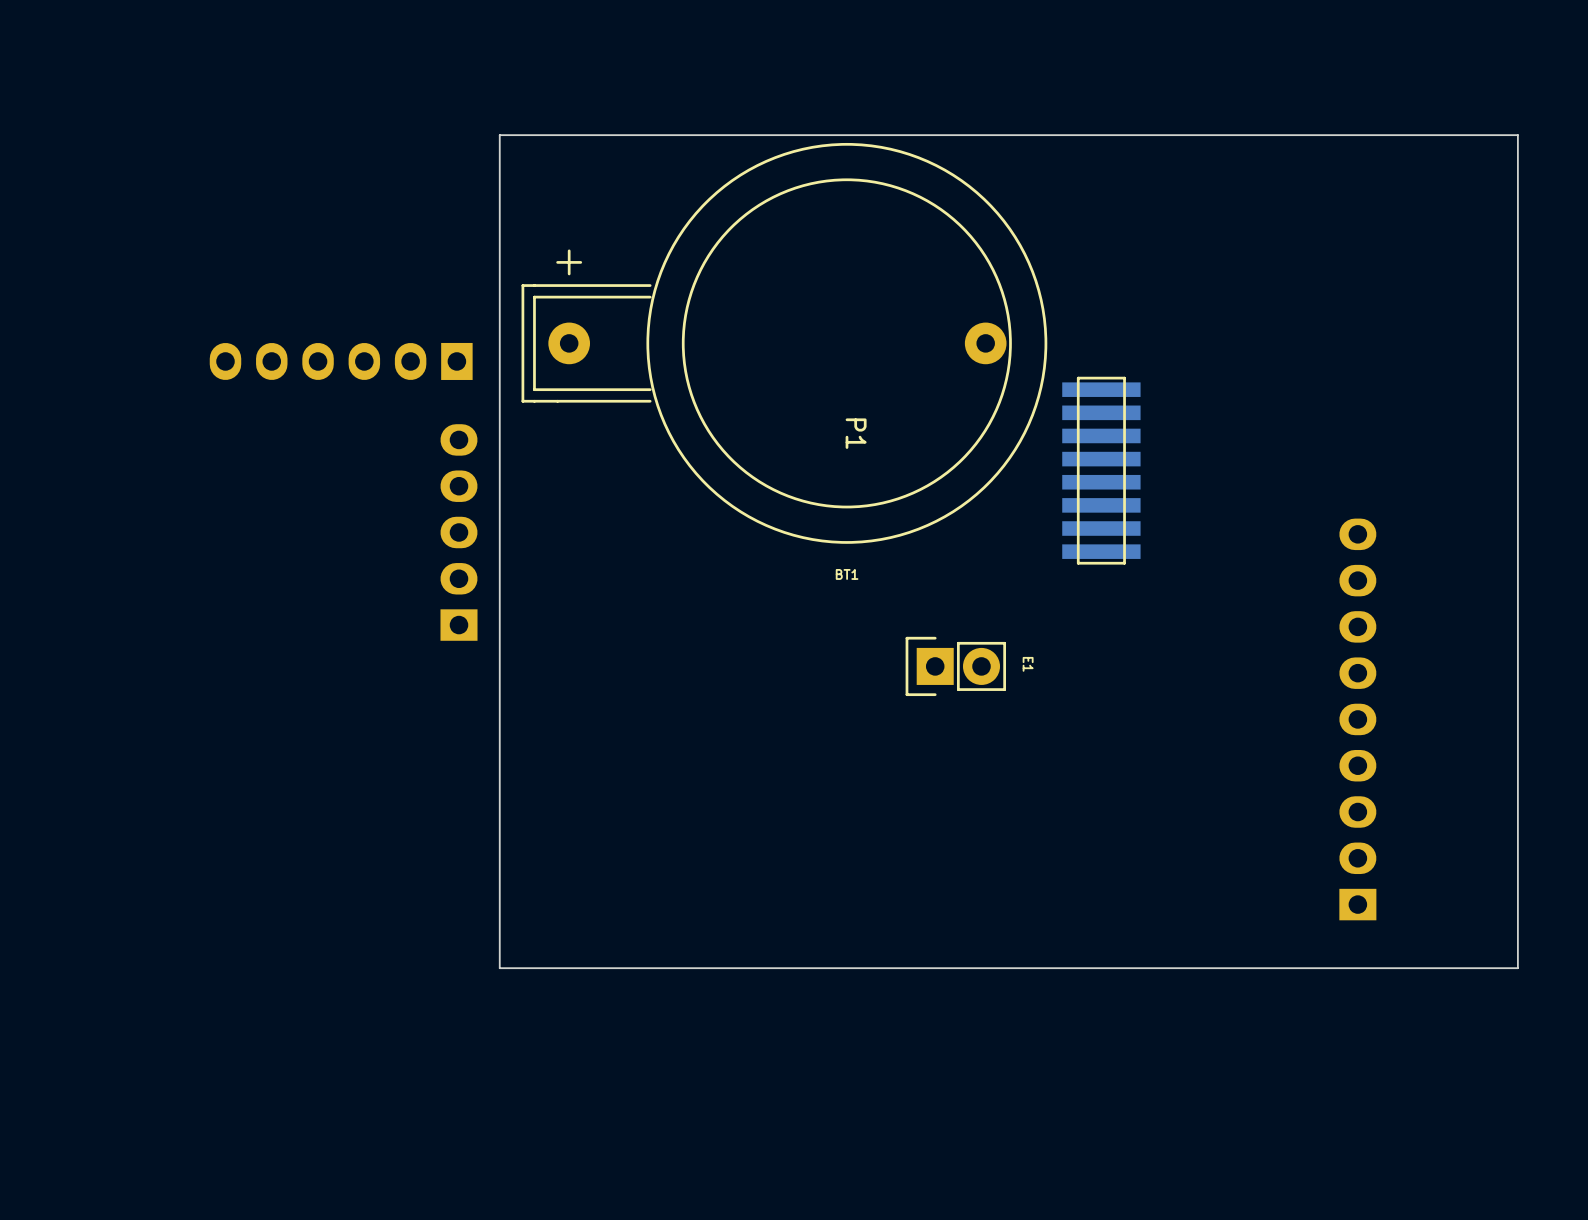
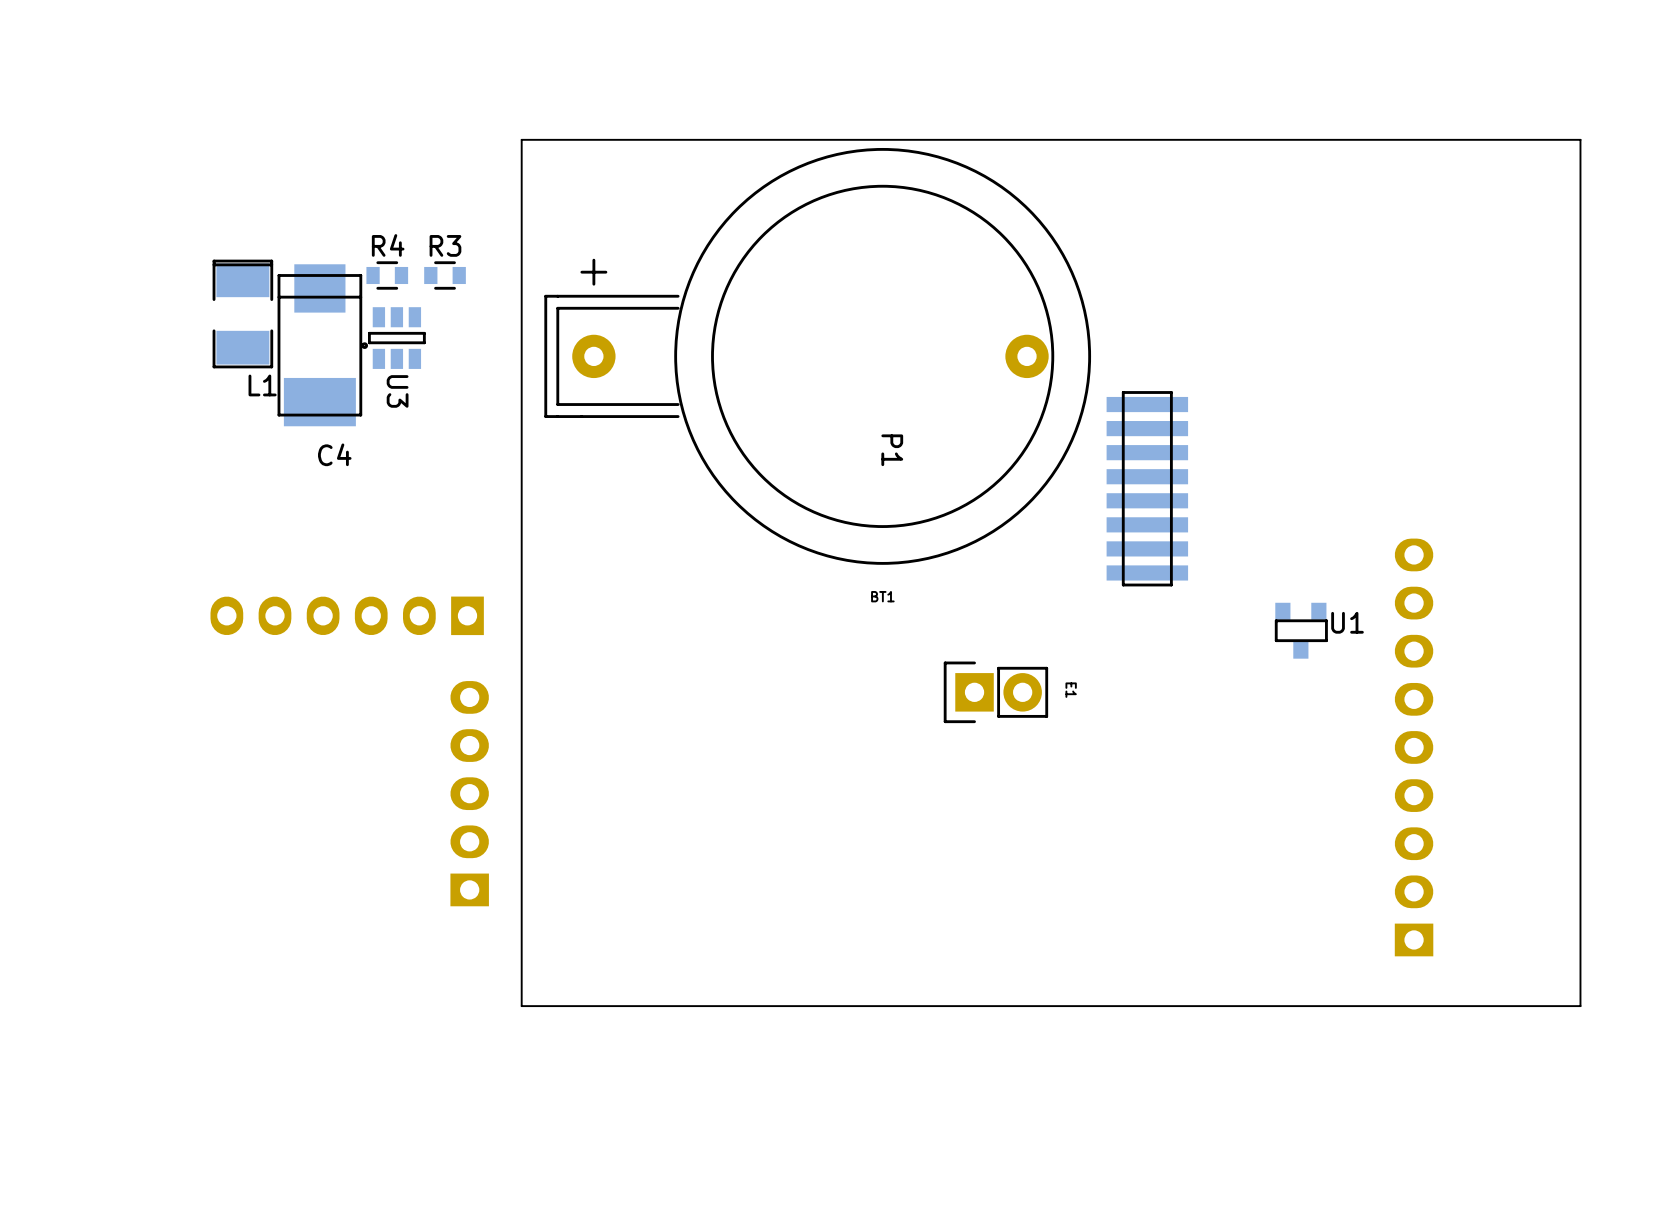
R4: none -> (387, 275)
R3: none -> (445, 275)
L1: none -> (242, 313)
U3: none -> (393, 338)
C4: none -> (319, 345)
part position: (341, 361) -> (347, 615)
part position: (458, 532) -> (469, 793)
U1: none -> (1301, 630)

